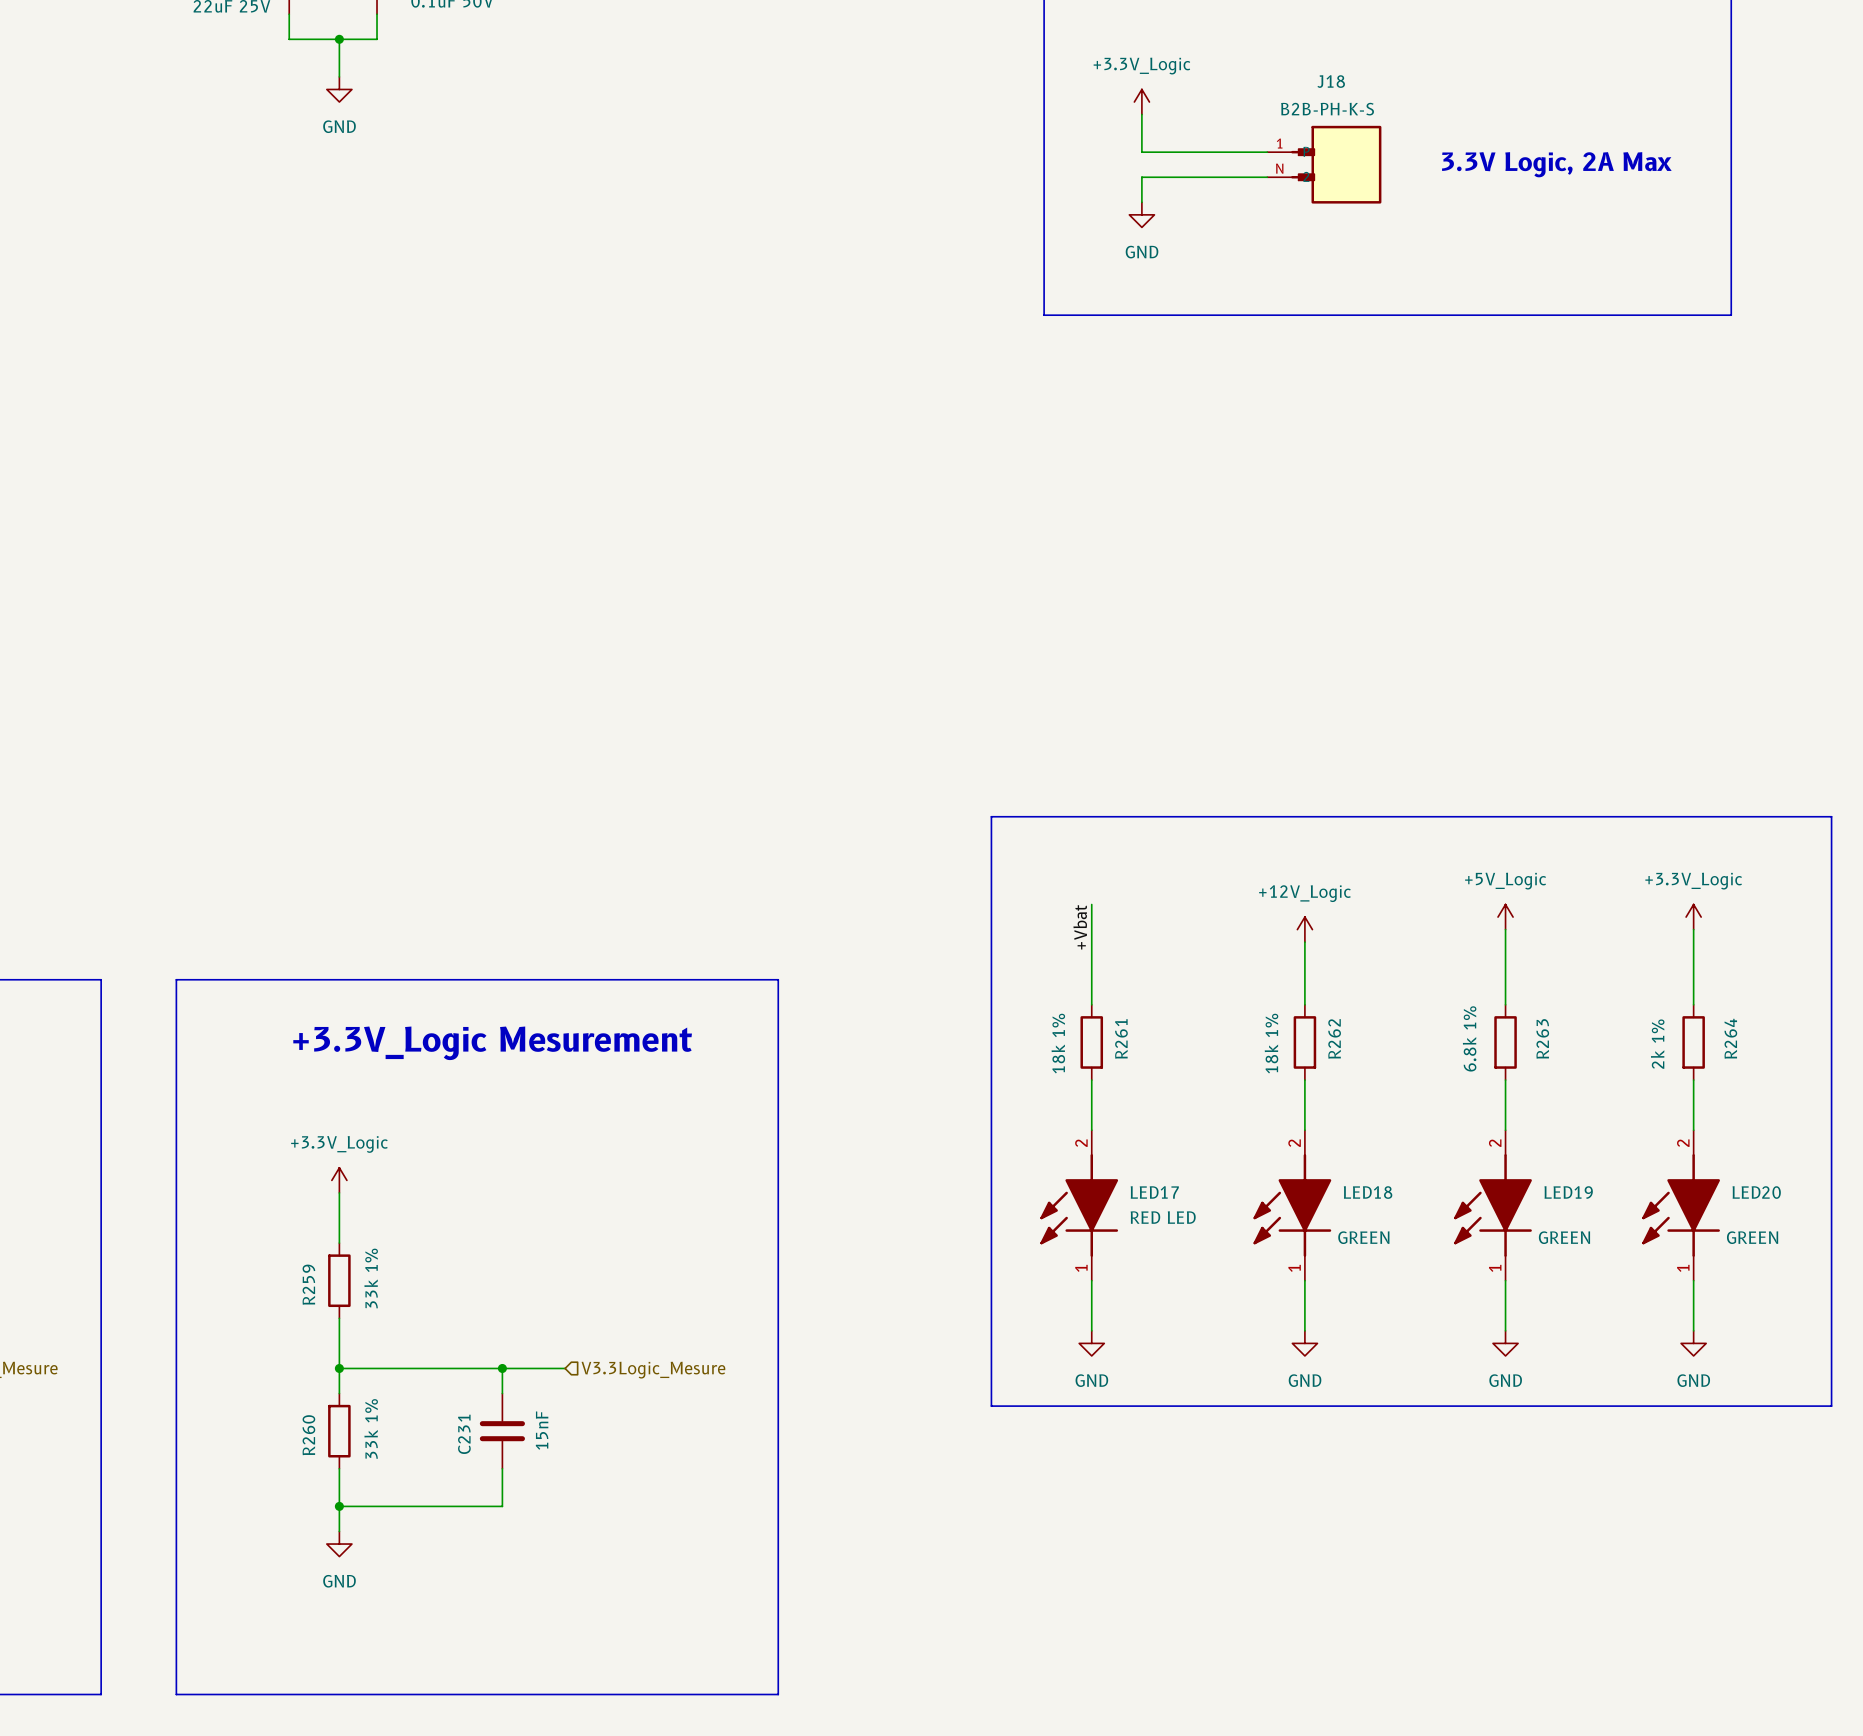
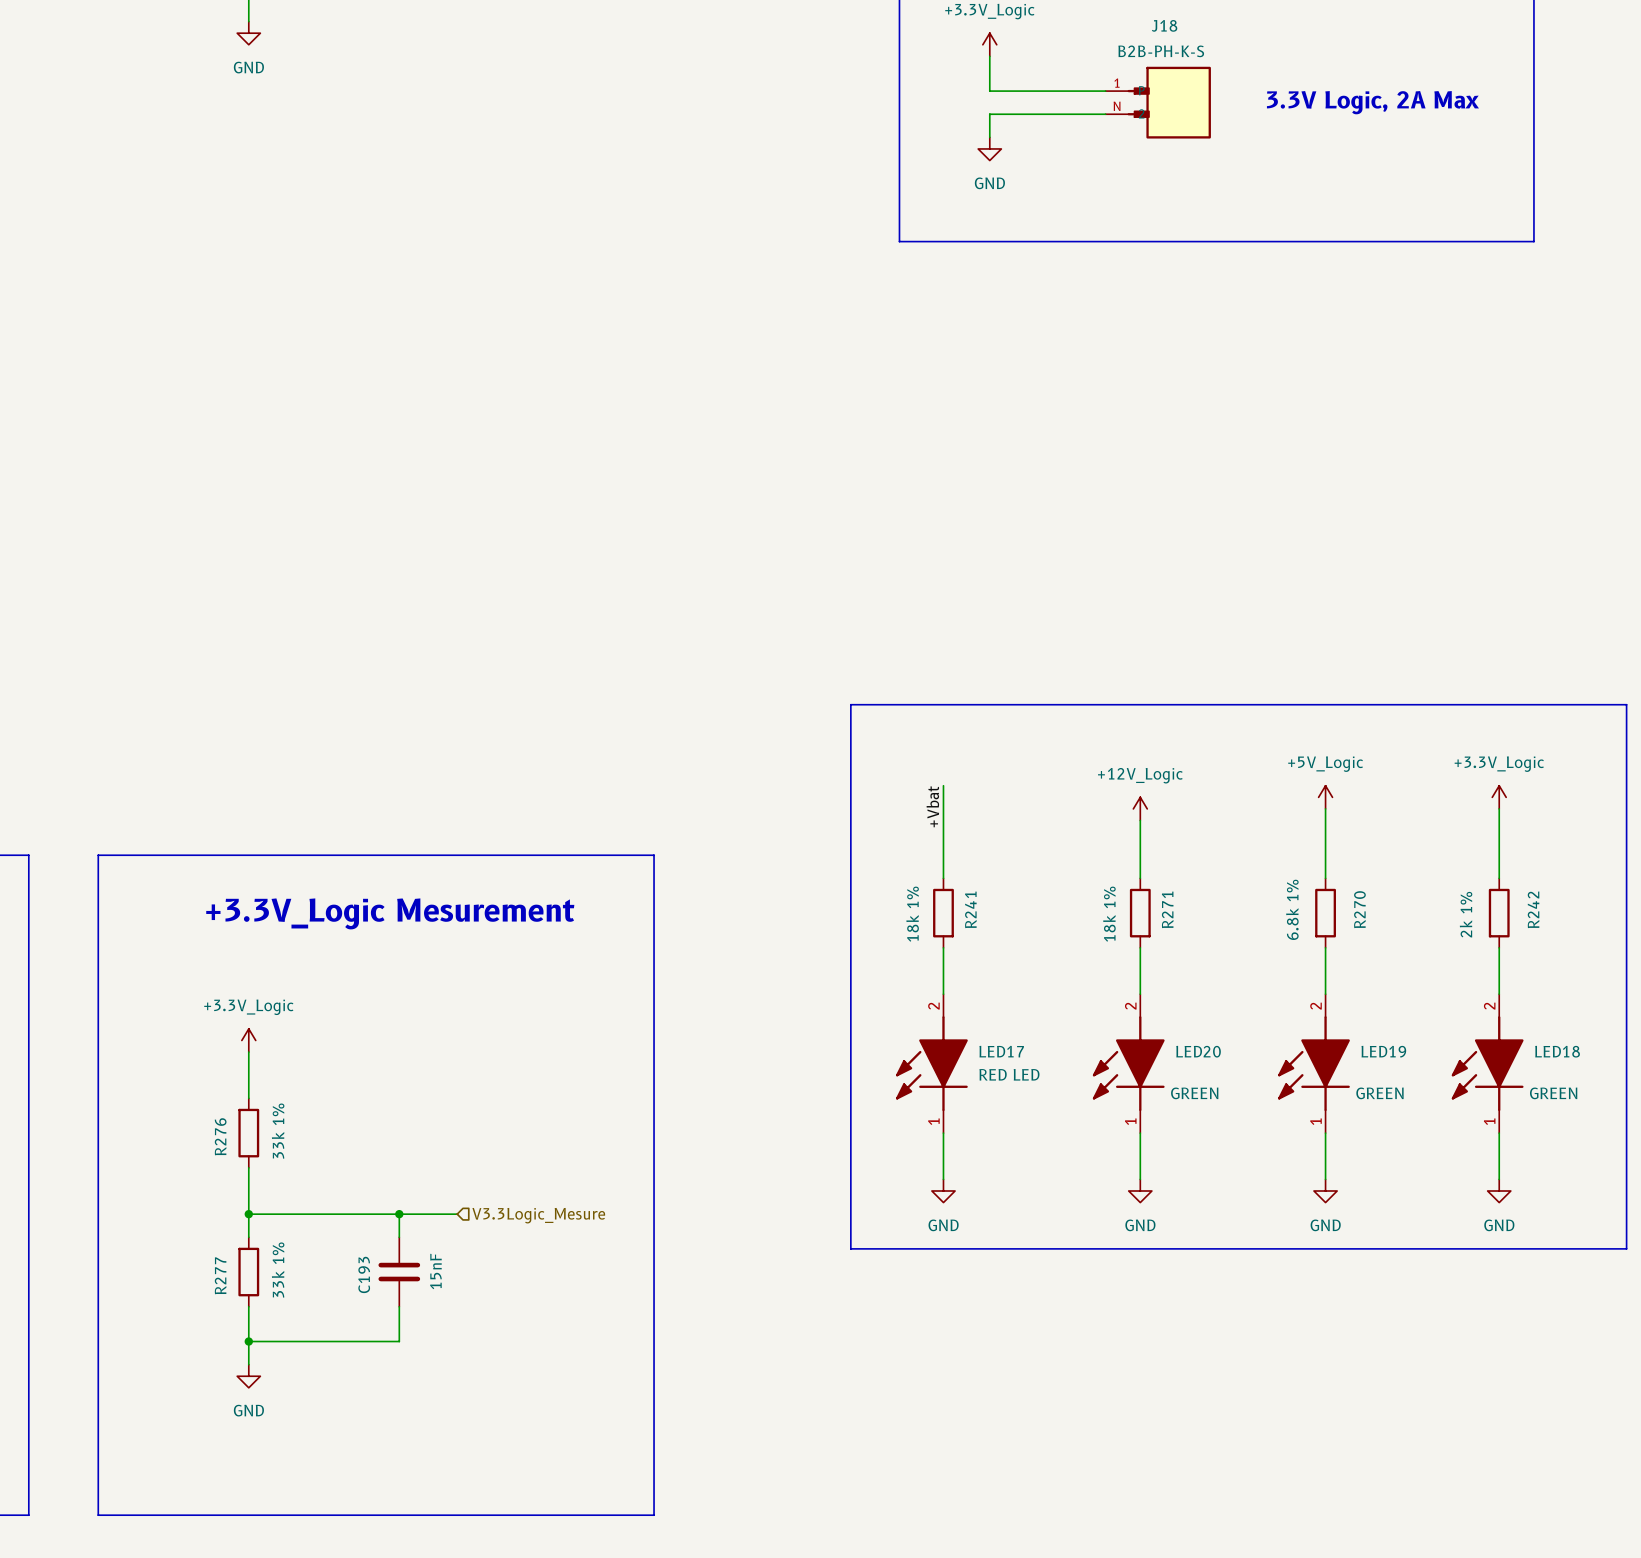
R261 name: R261 (1121, 1038) -> R241 (970, 909)
R262 name: R262 (1334, 1038) -> R271 (1167, 909)
R263 name: R263 (1542, 1038) -> R270 (1359, 909)
R264 name: R264 (1730, 1038) -> R242 (1533, 909)
LED18 name: LED18 (1368, 1192) -> LED20 (1198, 1051)
LED20 name: LED20 (1756, 1192) -> LED18 (1557, 1051)
R259 name: R259 (308, 1284) -> R276 (220, 1136)
C231 name: C231 (464, 1434) -> C193 (364, 1274)
R260 name: R260 (308, 1435) -> R277 (220, 1275)

